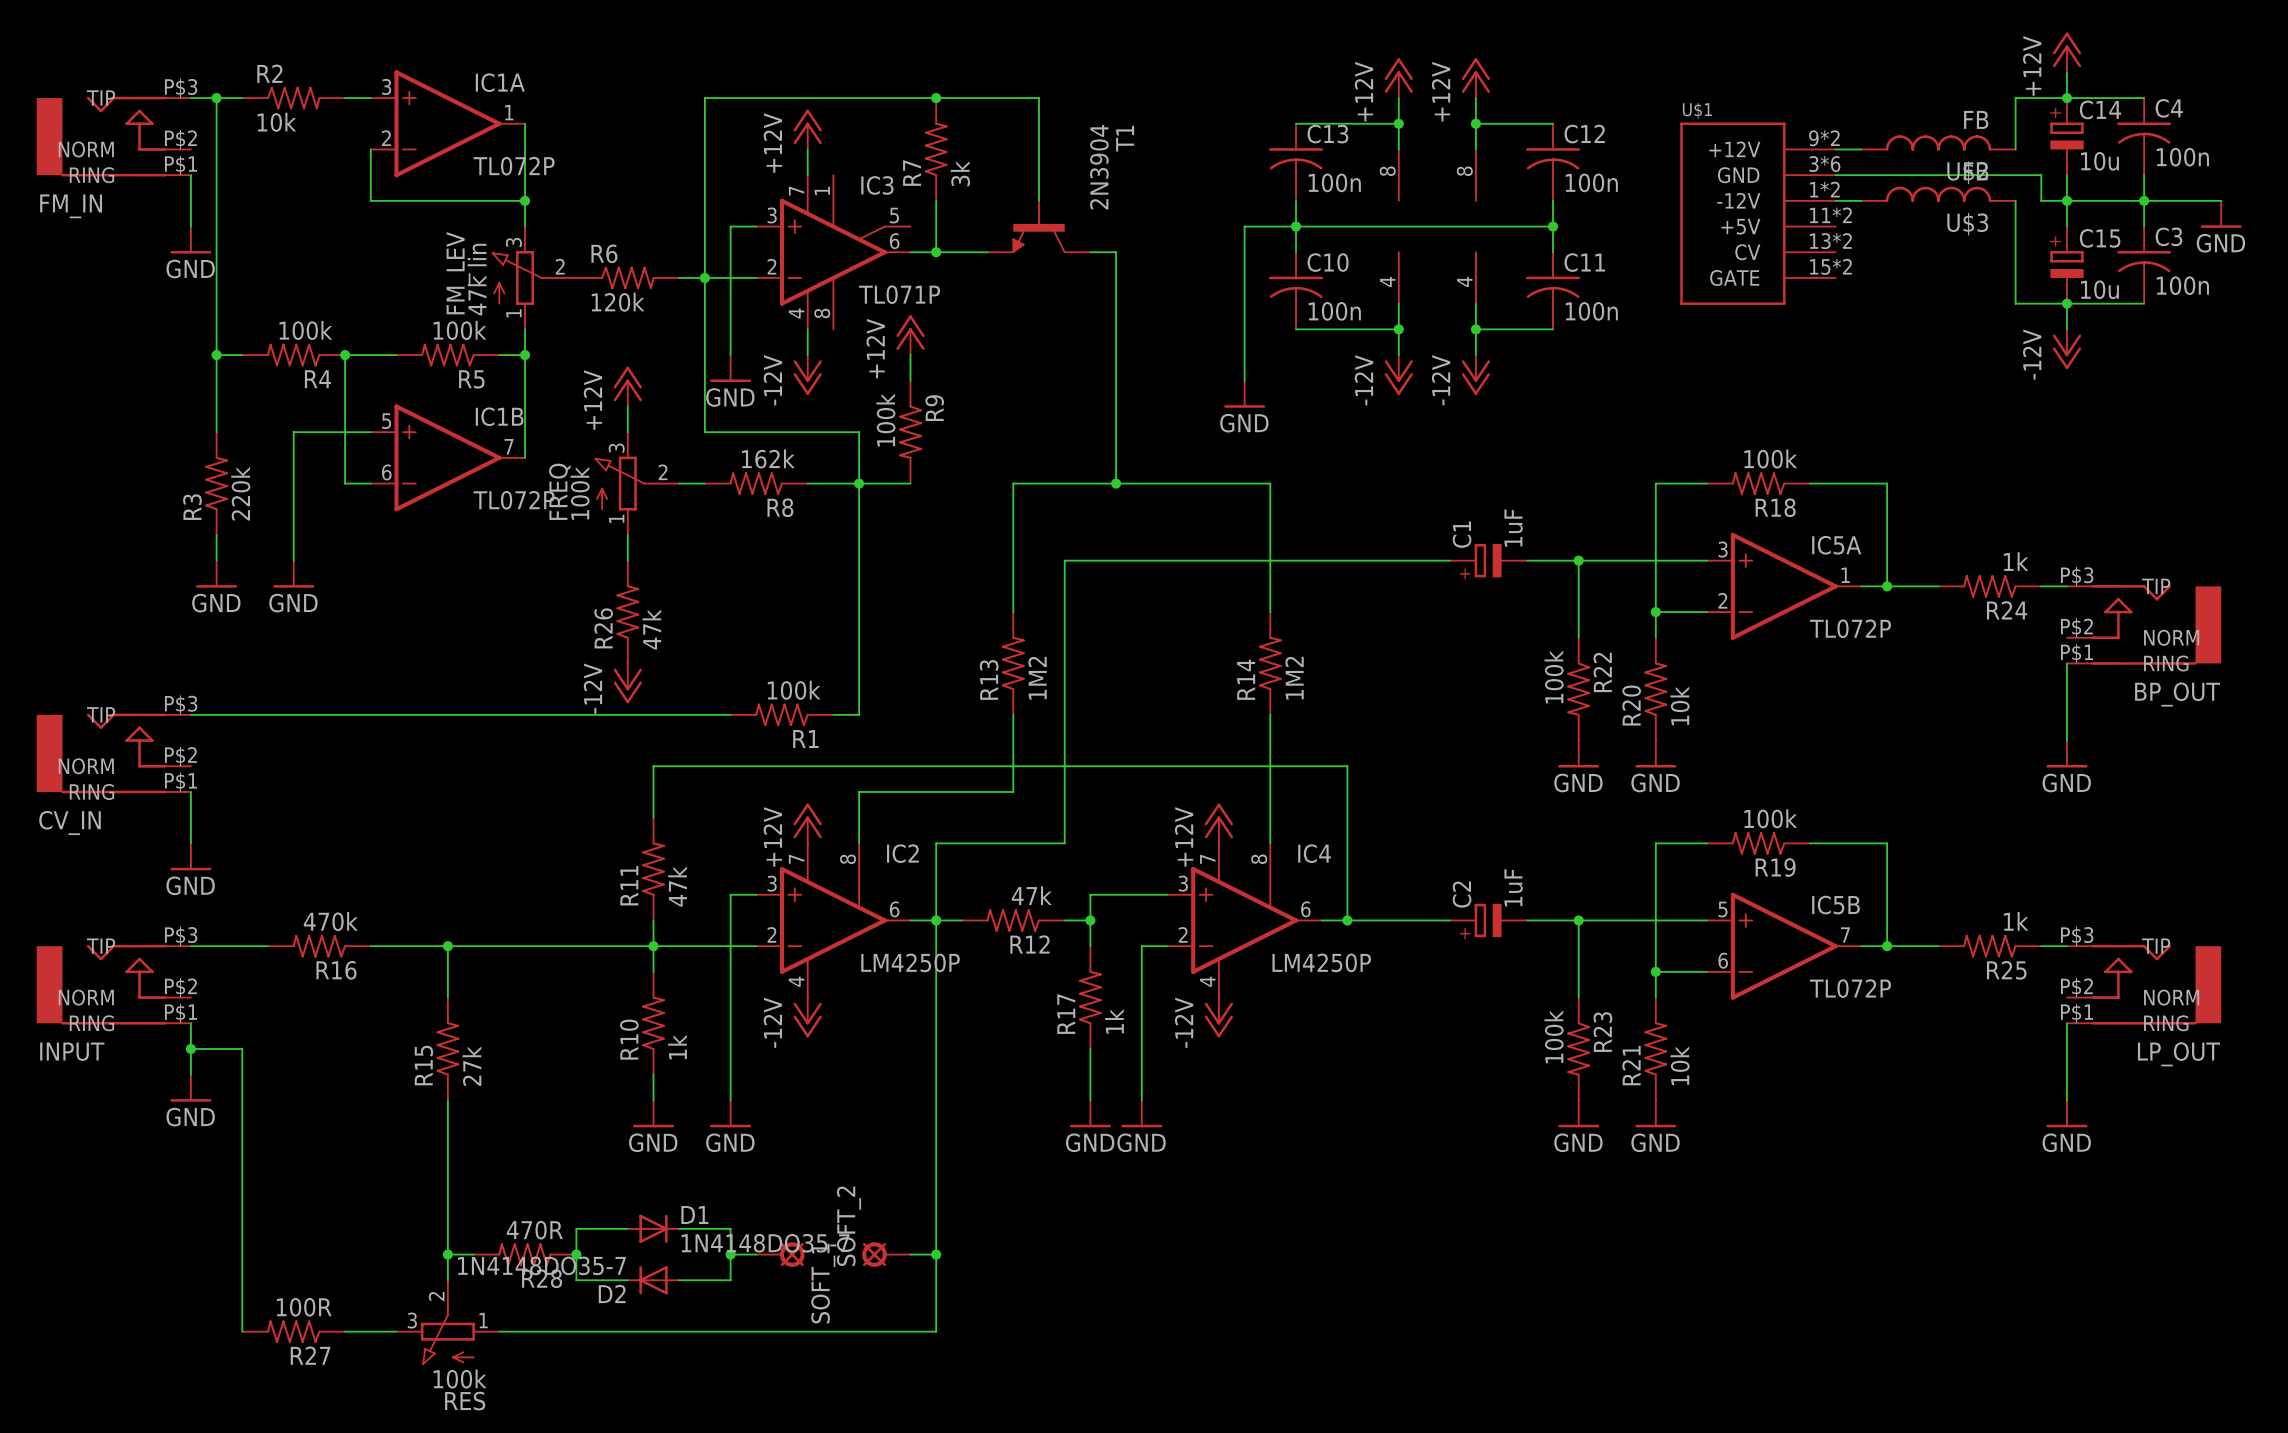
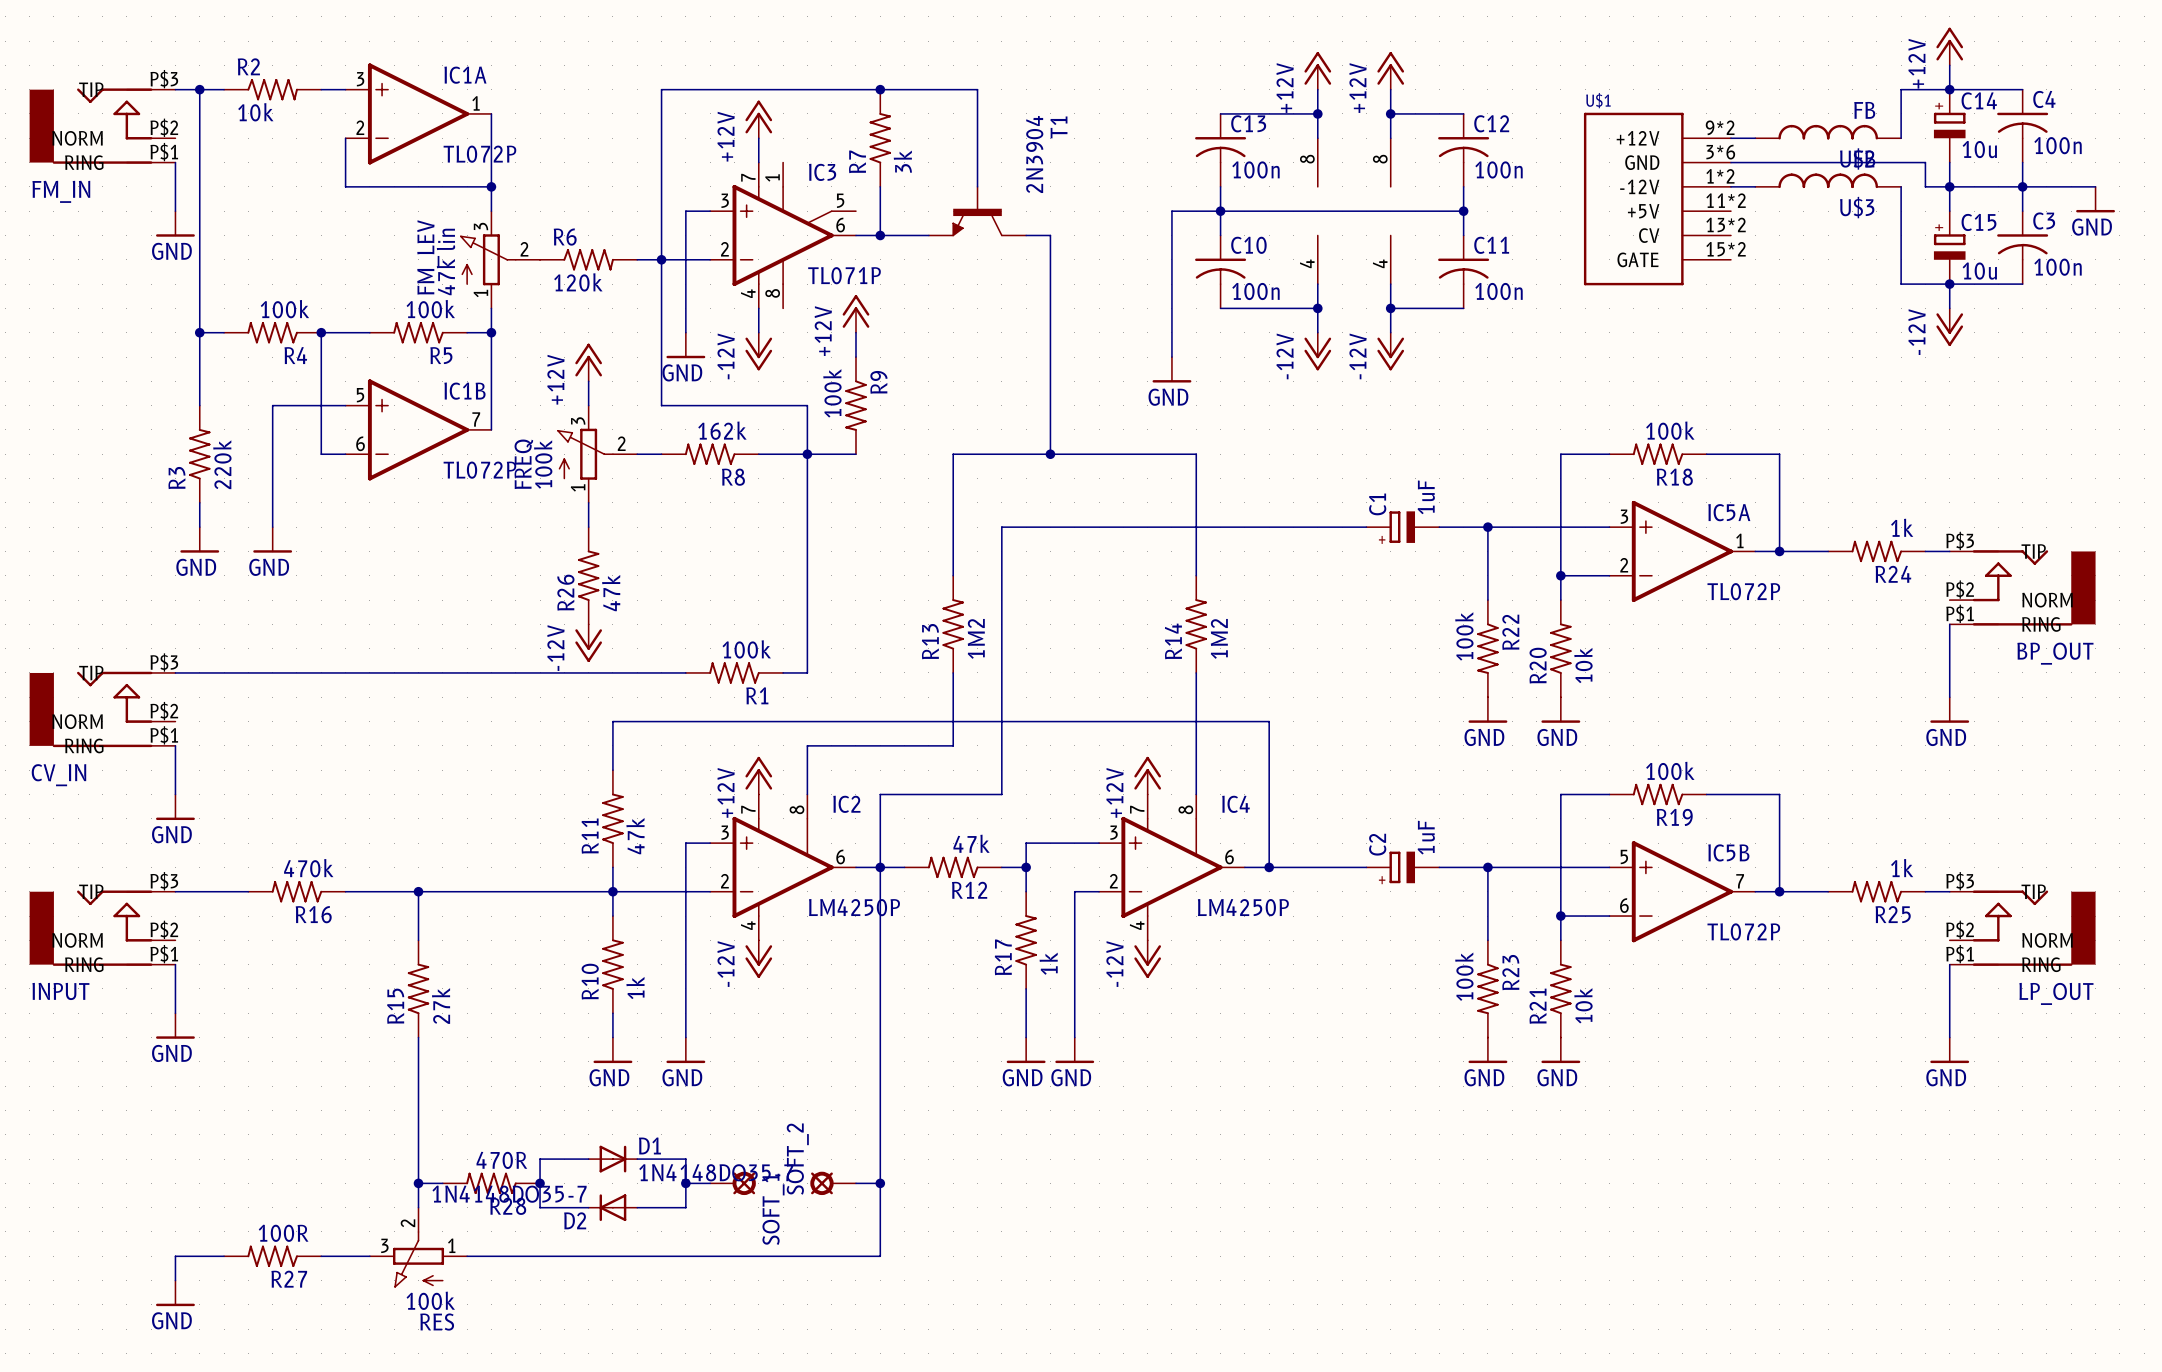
wire: (190, 1048) (242, 1048) (242, 1331) -> (175, 1280) (175, 1256) (224, 1256)
junction: (190, 1048) -> none
power symbol: none -> GND (175, 1293)

